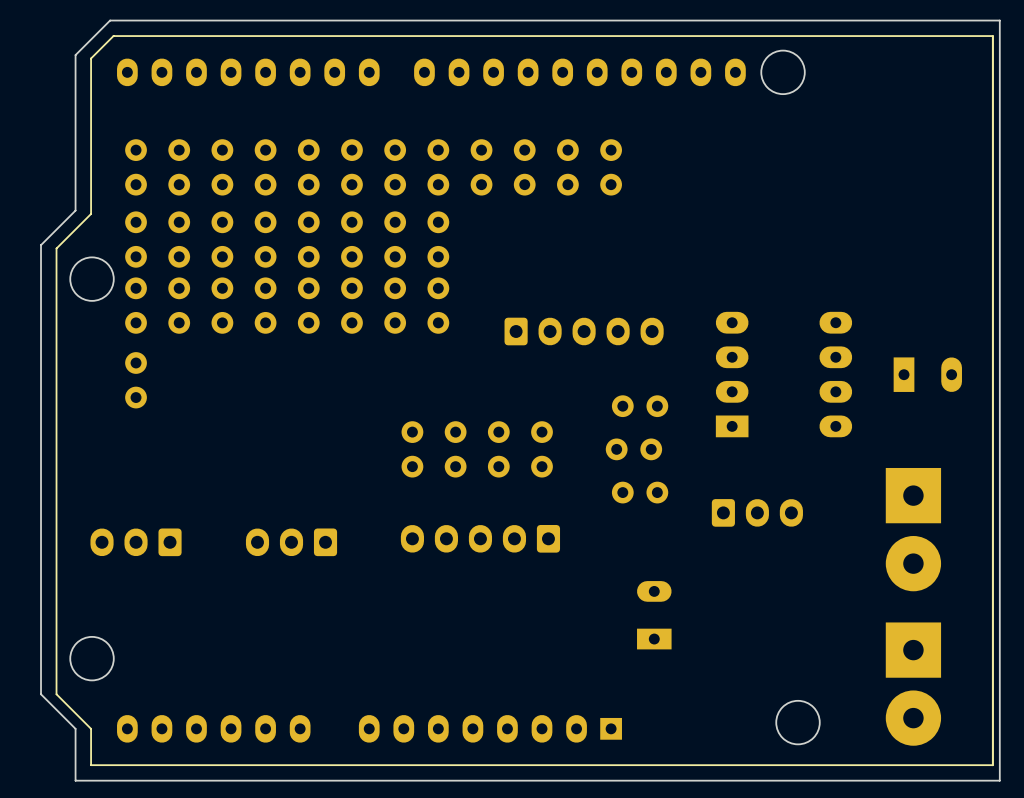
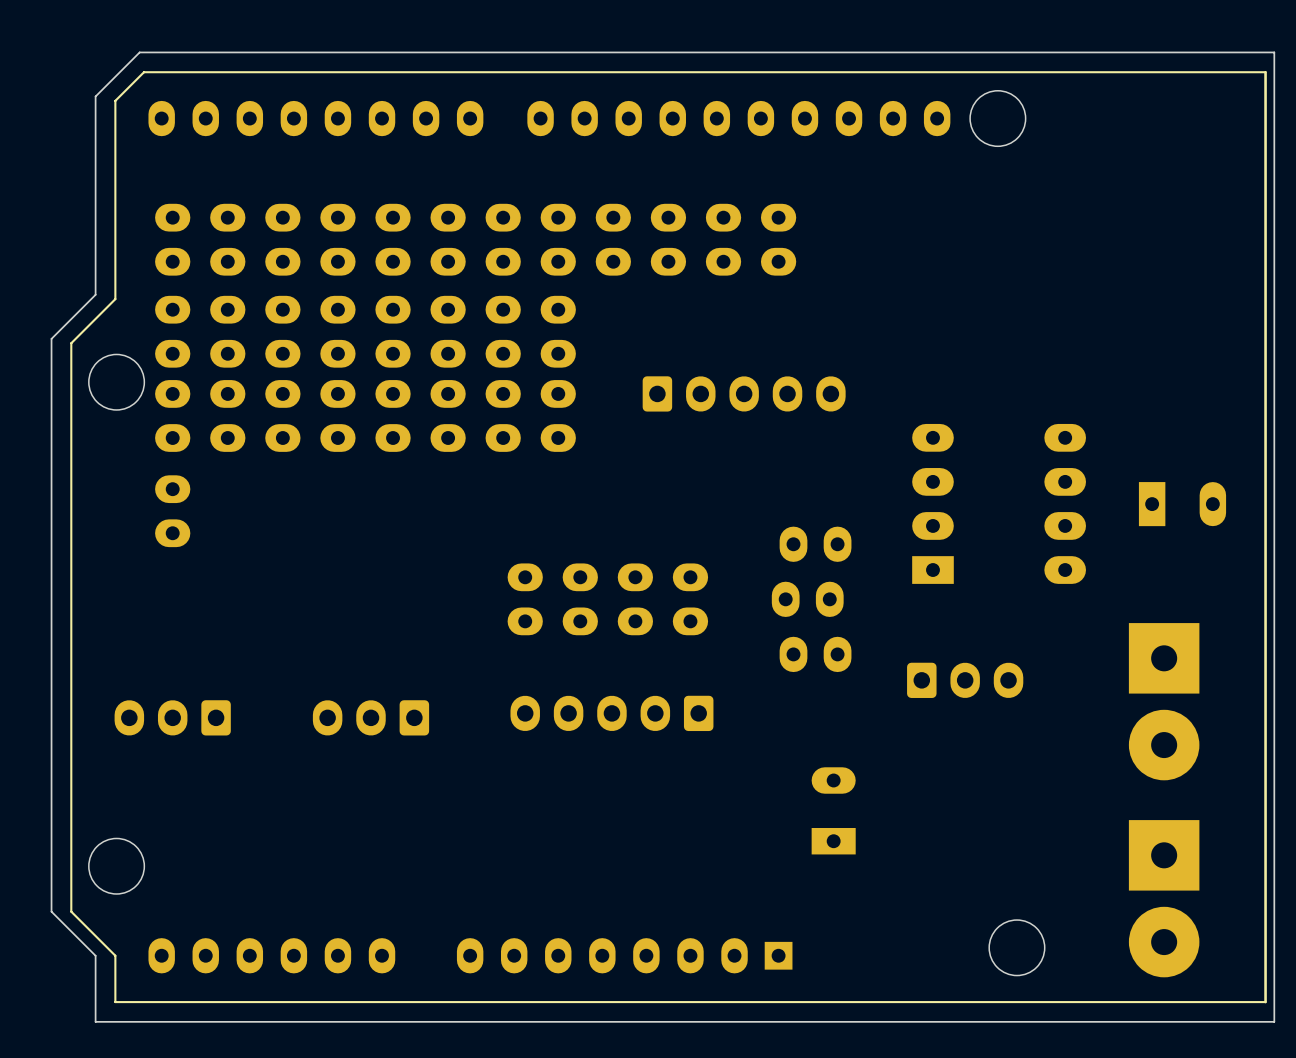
part footprint: [125, 139, 147, 196] -> [155, 203, 191, 276]
part footprint: [168, 139, 191, 196] -> [210, 203, 246, 276]
part footprint: [211, 139, 234, 196] -> [265, 203, 301, 276]
part footprint: [254, 139, 277, 196] -> [320, 203, 356, 276]
part footprint: [297, 139, 320, 196] -> [375, 203, 411, 276]
part footprint: [341, 139, 363, 196] -> [430, 203, 466, 276]
part footprint: [384, 139, 407, 196] -> [485, 203, 521, 276]
part footprint: [427, 139, 450, 196] -> [540, 203, 576, 276]
part footprint: [470, 139, 493, 196] -> [595, 203, 631, 276]
part footprint: [513, 139, 536, 196] -> [650, 203, 687, 276]
part footprint: [557, 139, 579, 196] -> [705, 203, 742, 276]
part footprint: [600, 139, 622, 196] -> [760, 203, 797, 276]
part footprint: [125, 211, 147, 268] -> [155, 295, 191, 368]
part footprint: [168, 211, 191, 268] -> [210, 295, 246, 368]
part footprint: [211, 211, 234, 268] -> [265, 295, 301, 368]
part footprint: [254, 211, 277, 268] -> [320, 295, 356, 368]
part footprint: [297, 211, 320, 268] -> [375, 295, 411, 368]
part footprint: [341, 211, 363, 268] -> [430, 295, 466, 368]
part footprint: [384, 211, 407, 268] -> [485, 295, 521, 368]
part footprint: [427, 211, 450, 268] -> [540, 295, 576, 368]
part footprint: [125, 277, 147, 334] -> [155, 380, 191, 452]
part footprint: [168, 277, 191, 334] -> [210, 380, 246, 452]
part footprint: [211, 277, 234, 334] -> [265, 380, 301, 452]
part footprint: [254, 277, 277, 334] -> [320, 380, 356, 452]
part footprint: [297, 277, 320, 334] -> [375, 380, 411, 452]
part footprint: [341, 277, 363, 334] -> [430, 380, 466, 452]
part footprint: [384, 277, 407, 334] -> [485, 380, 521, 452]
part footprint: [427, 277, 450, 334] -> [540, 380, 576, 452]
part position: (584, 331) -> (744, 393)
part footprint: [125, 352, 147, 409] -> [155, 475, 191, 548]
part footprint: [611, 395, 669, 418] -> [779, 526, 852, 562]
part footprint: [401, 421, 424, 478] -> [507, 563, 543, 636]
part footprint: [444, 421, 467, 478] -> [562, 563, 598, 636]
part footprint: [487, 421, 510, 478] -> [617, 563, 654, 636]
part footprint: [531, 421, 553, 478] -> [672, 563, 709, 636]
part footprint: [605, 438, 663, 461] -> [771, 581, 844, 617]
part footprint: [611, 481, 669, 504] -> [779, 636, 852, 673]

